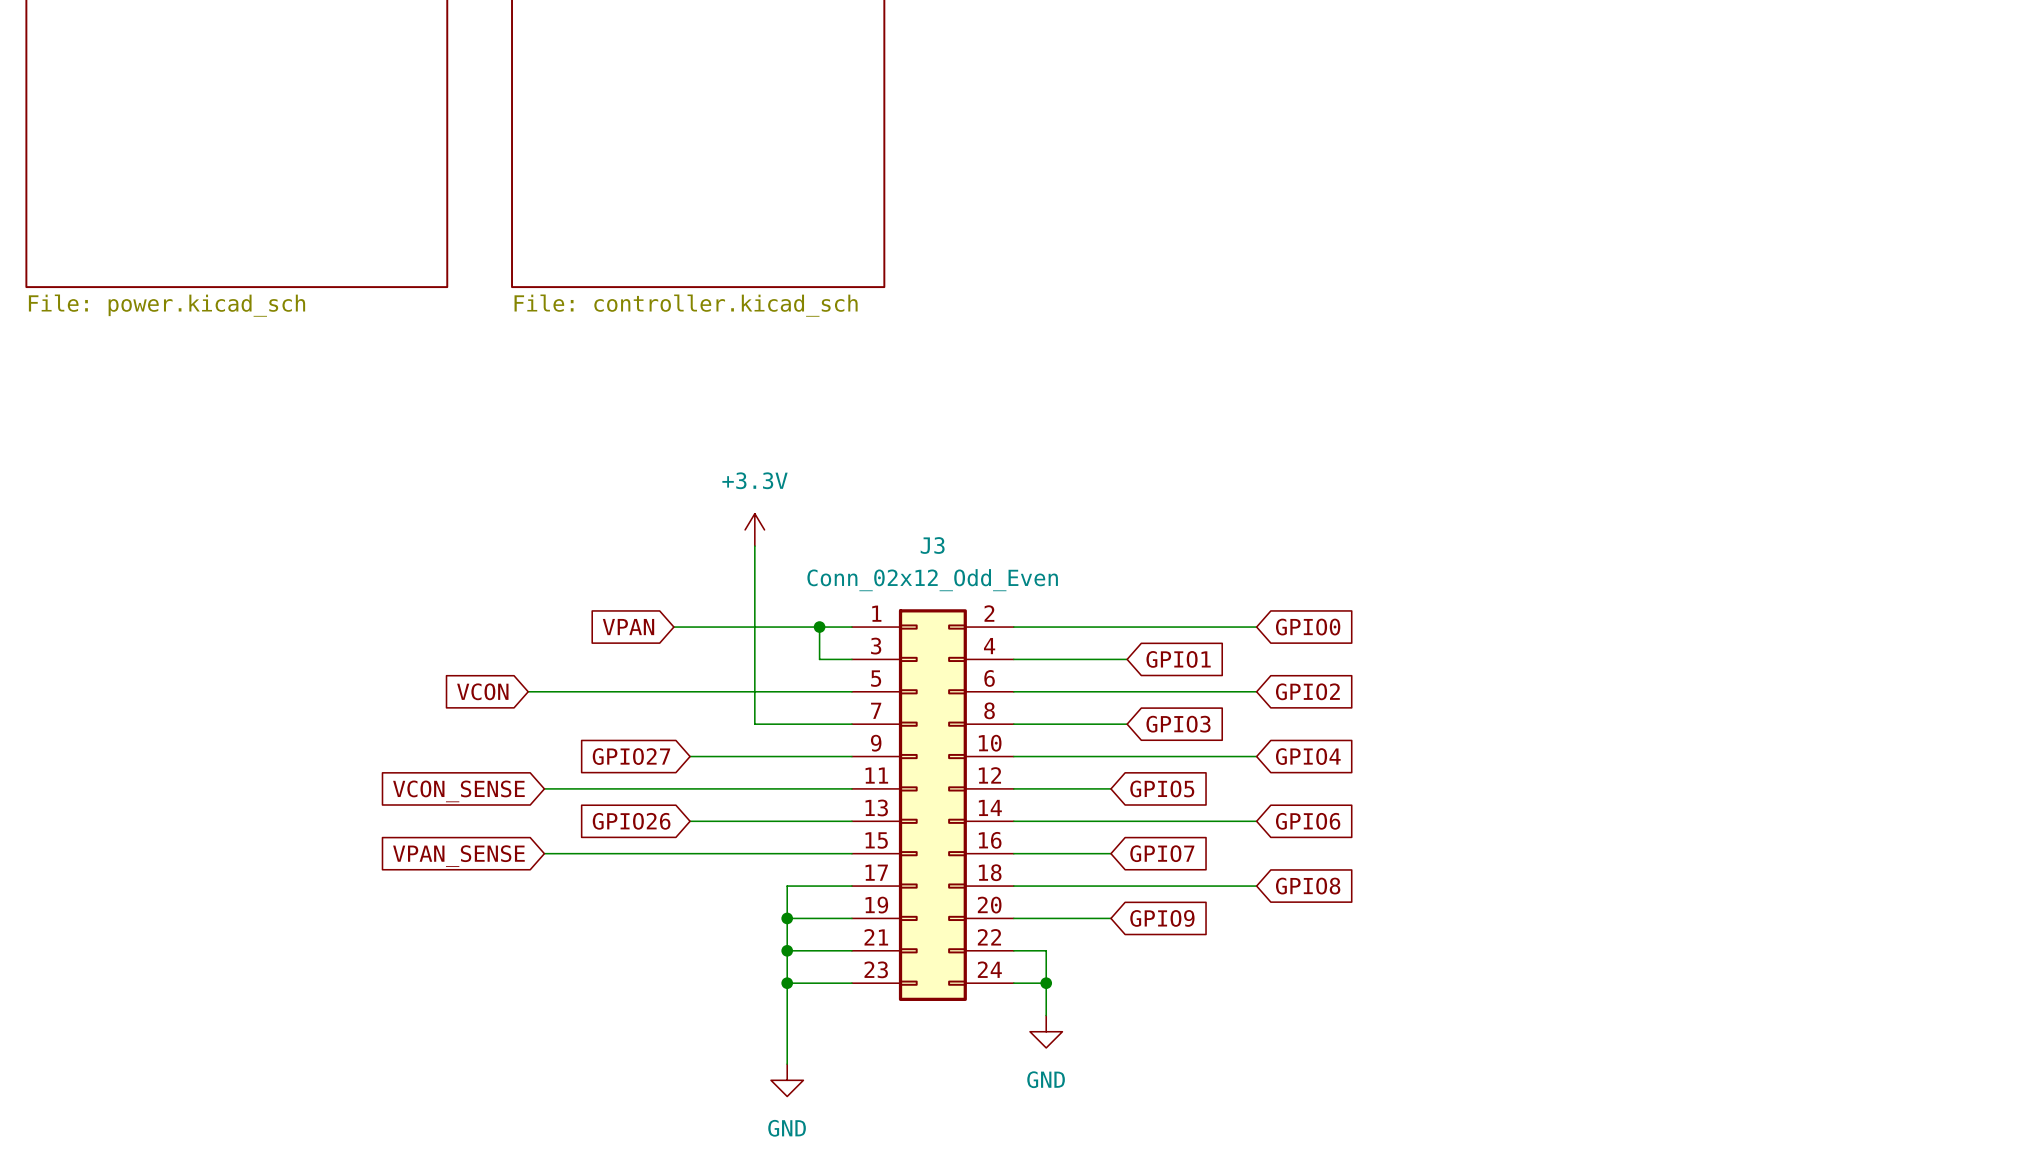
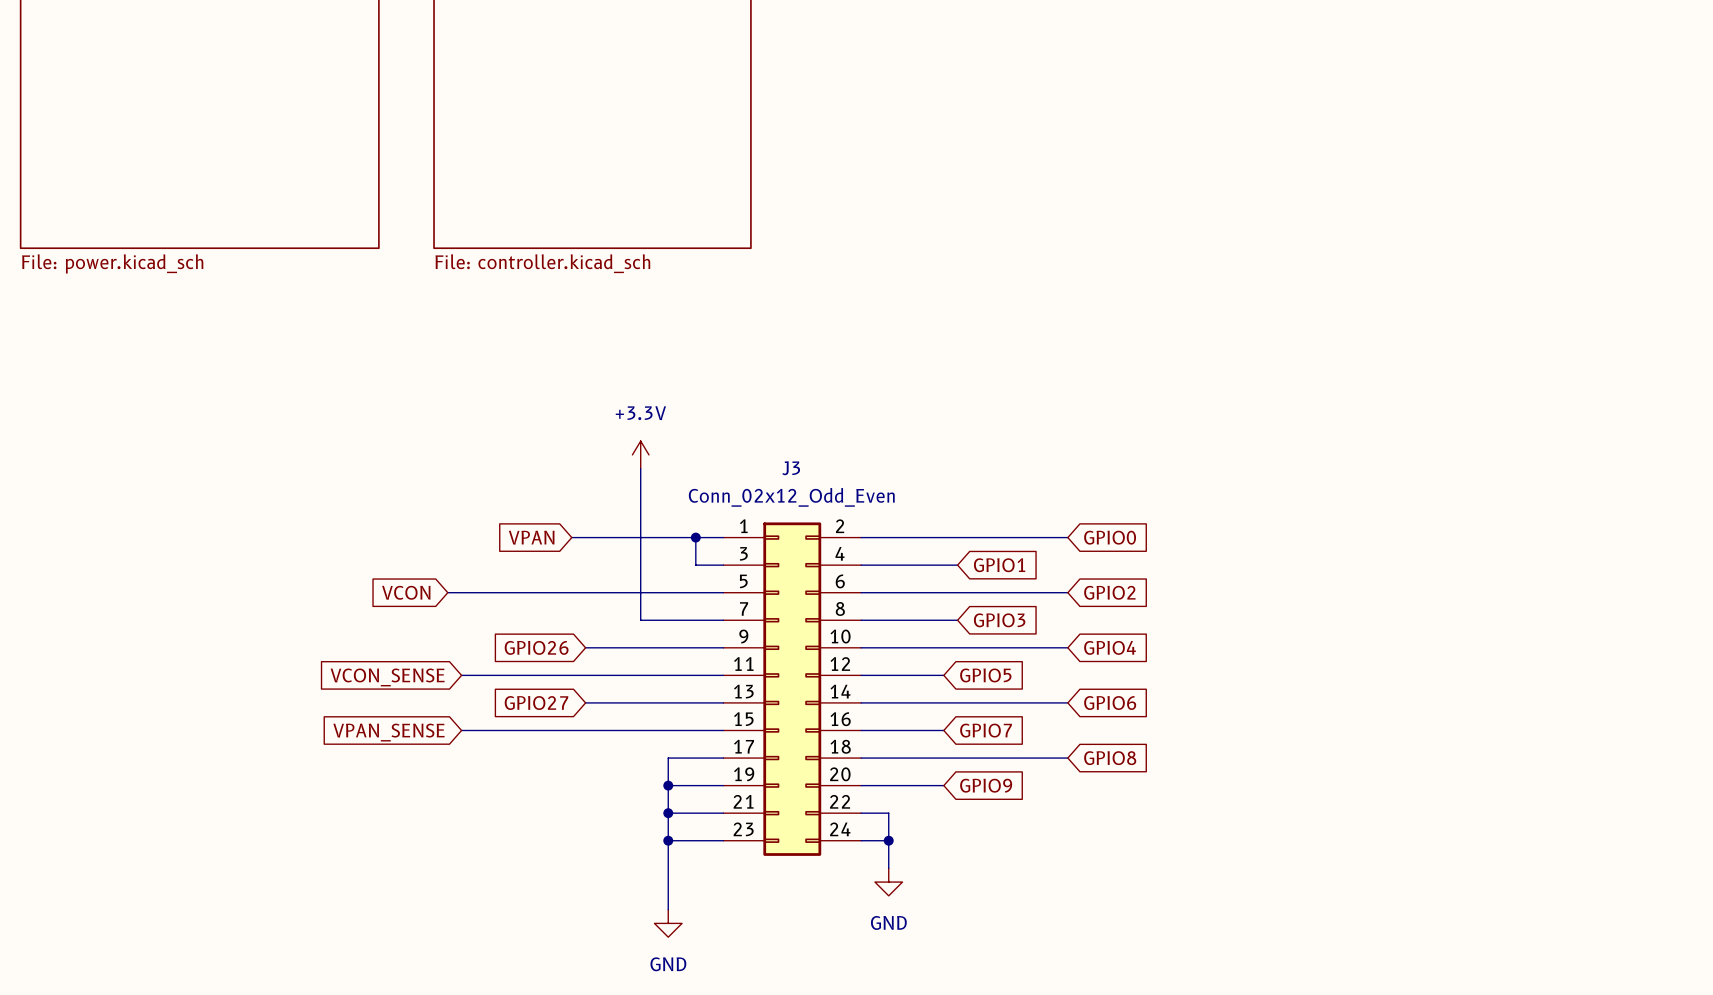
global label: GPIO27 (631, 756) -> GPIO26 (536, 647)
global label: GPIO26 (631, 821) -> GPIO27 (536, 703)

